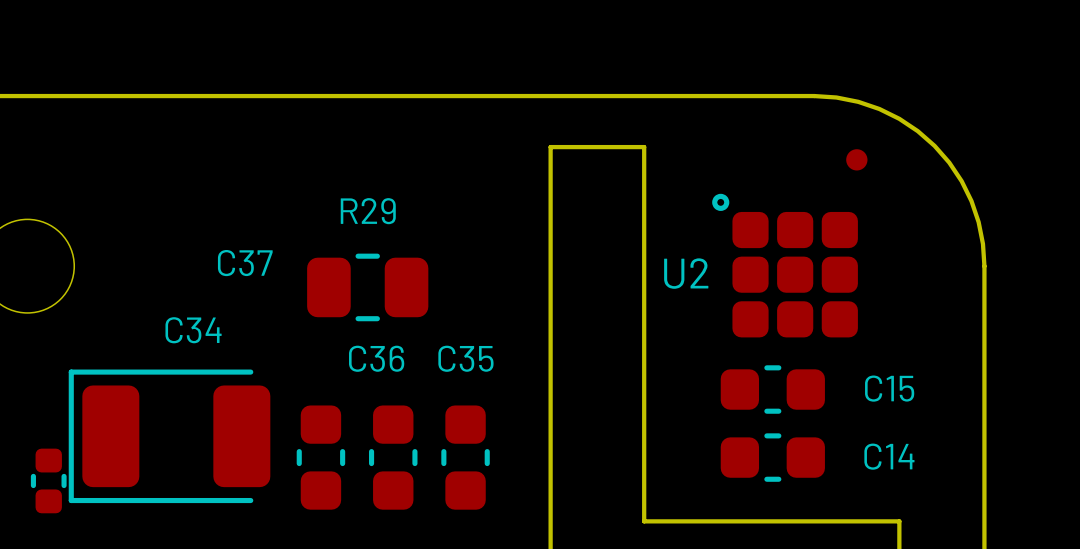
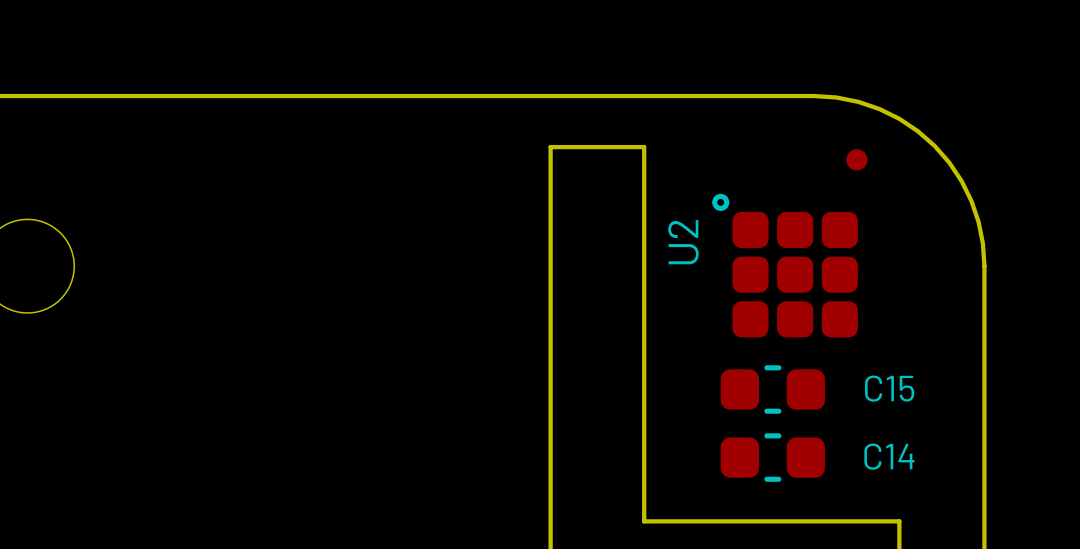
U2 name rotation: 0° (686, 273) -> 90° counterclockwise (683, 242)
R29: (367, 287) -> none
C34: (169, 436) -> none
C37: (320, 457) -> none
C36: (393, 457) -> none
C35: (465, 457) -> none
part: (48, 480) -> none

